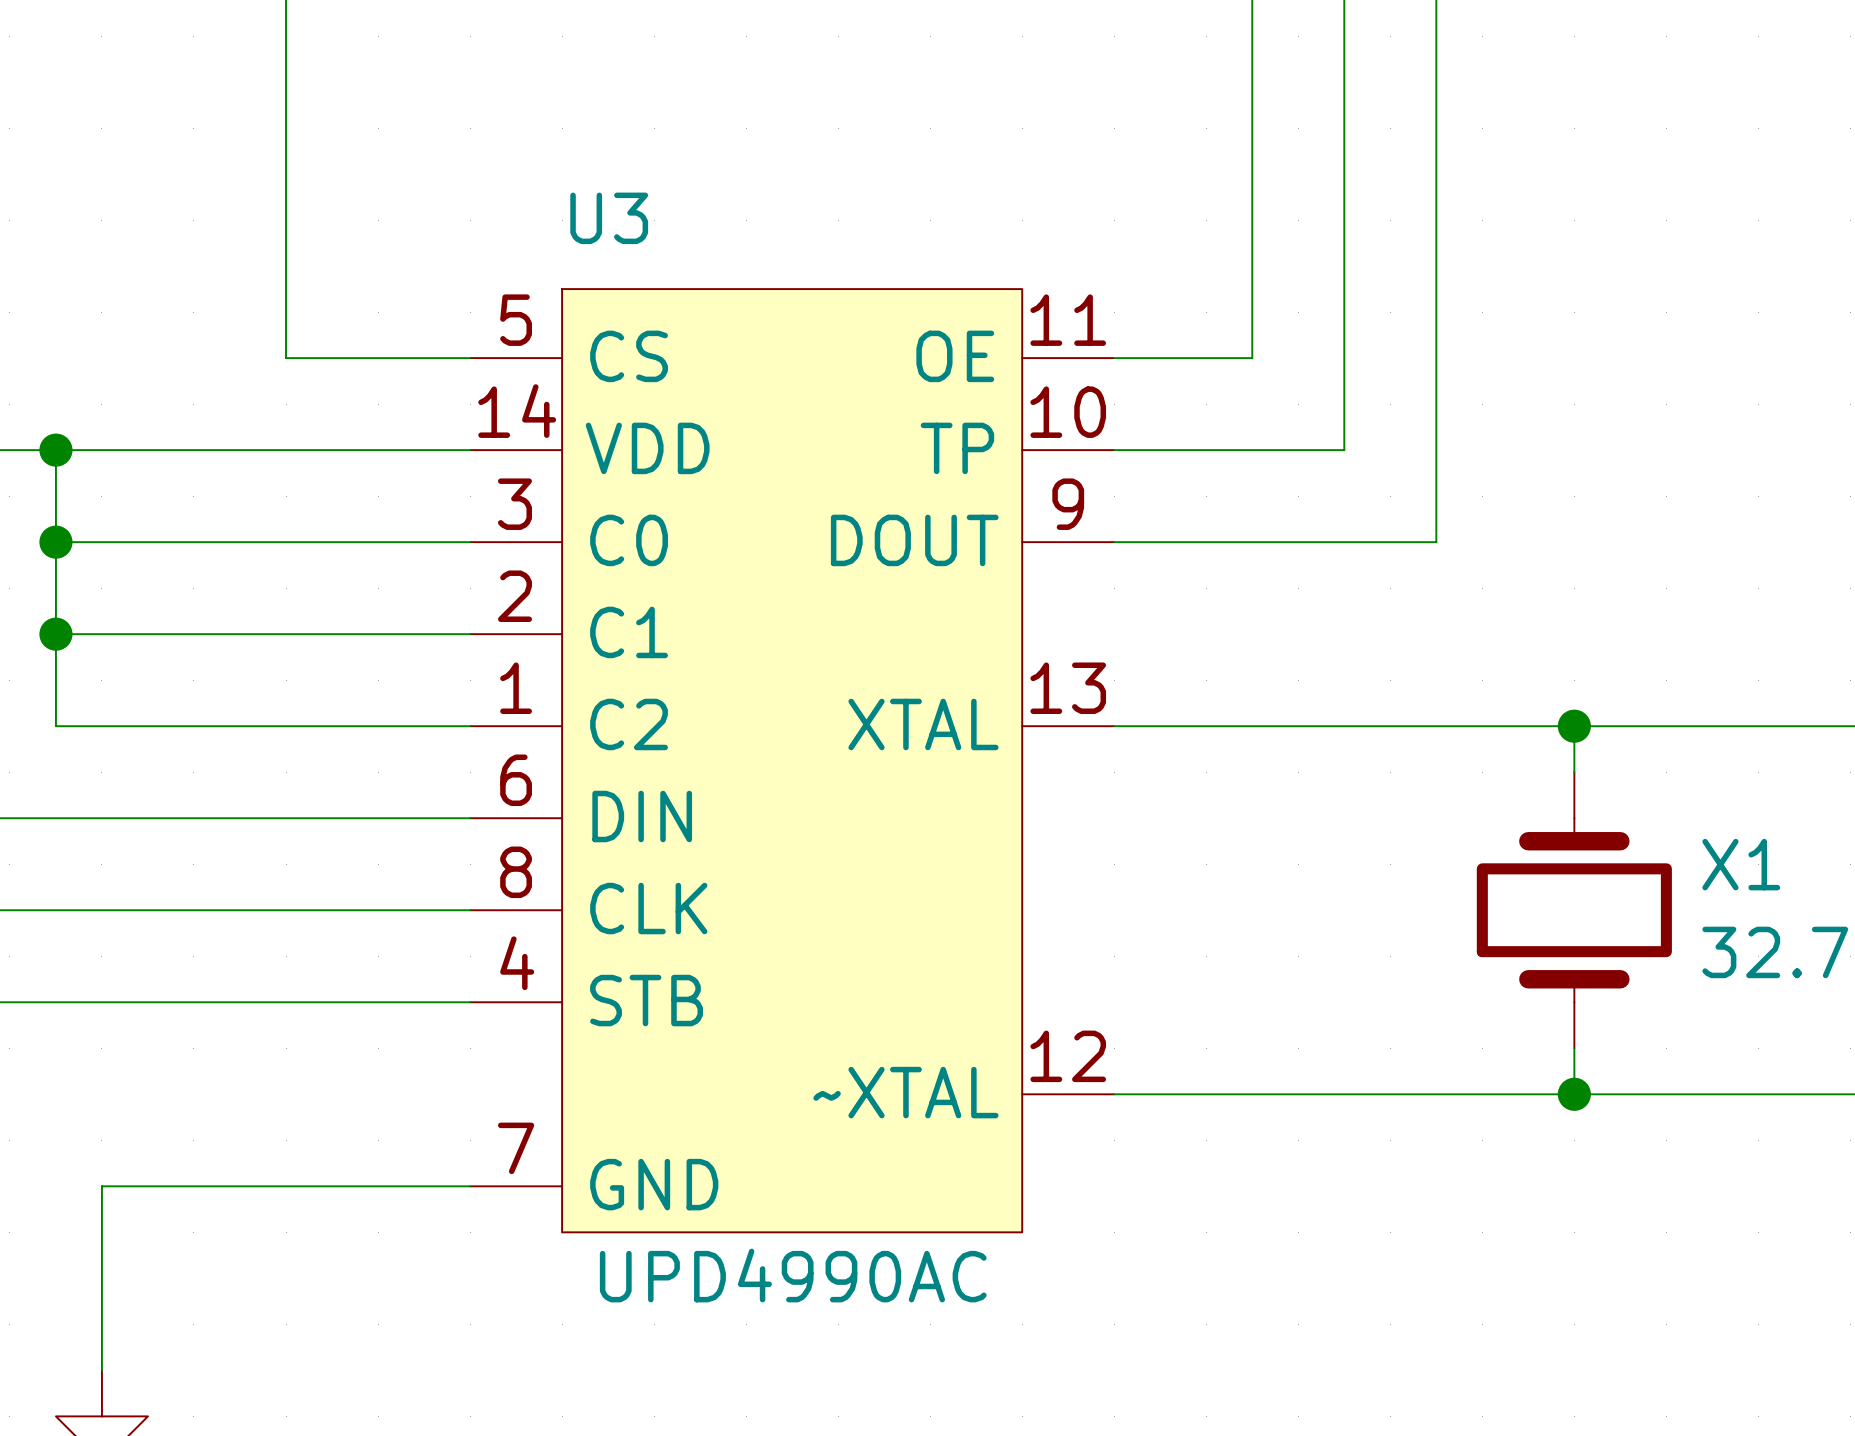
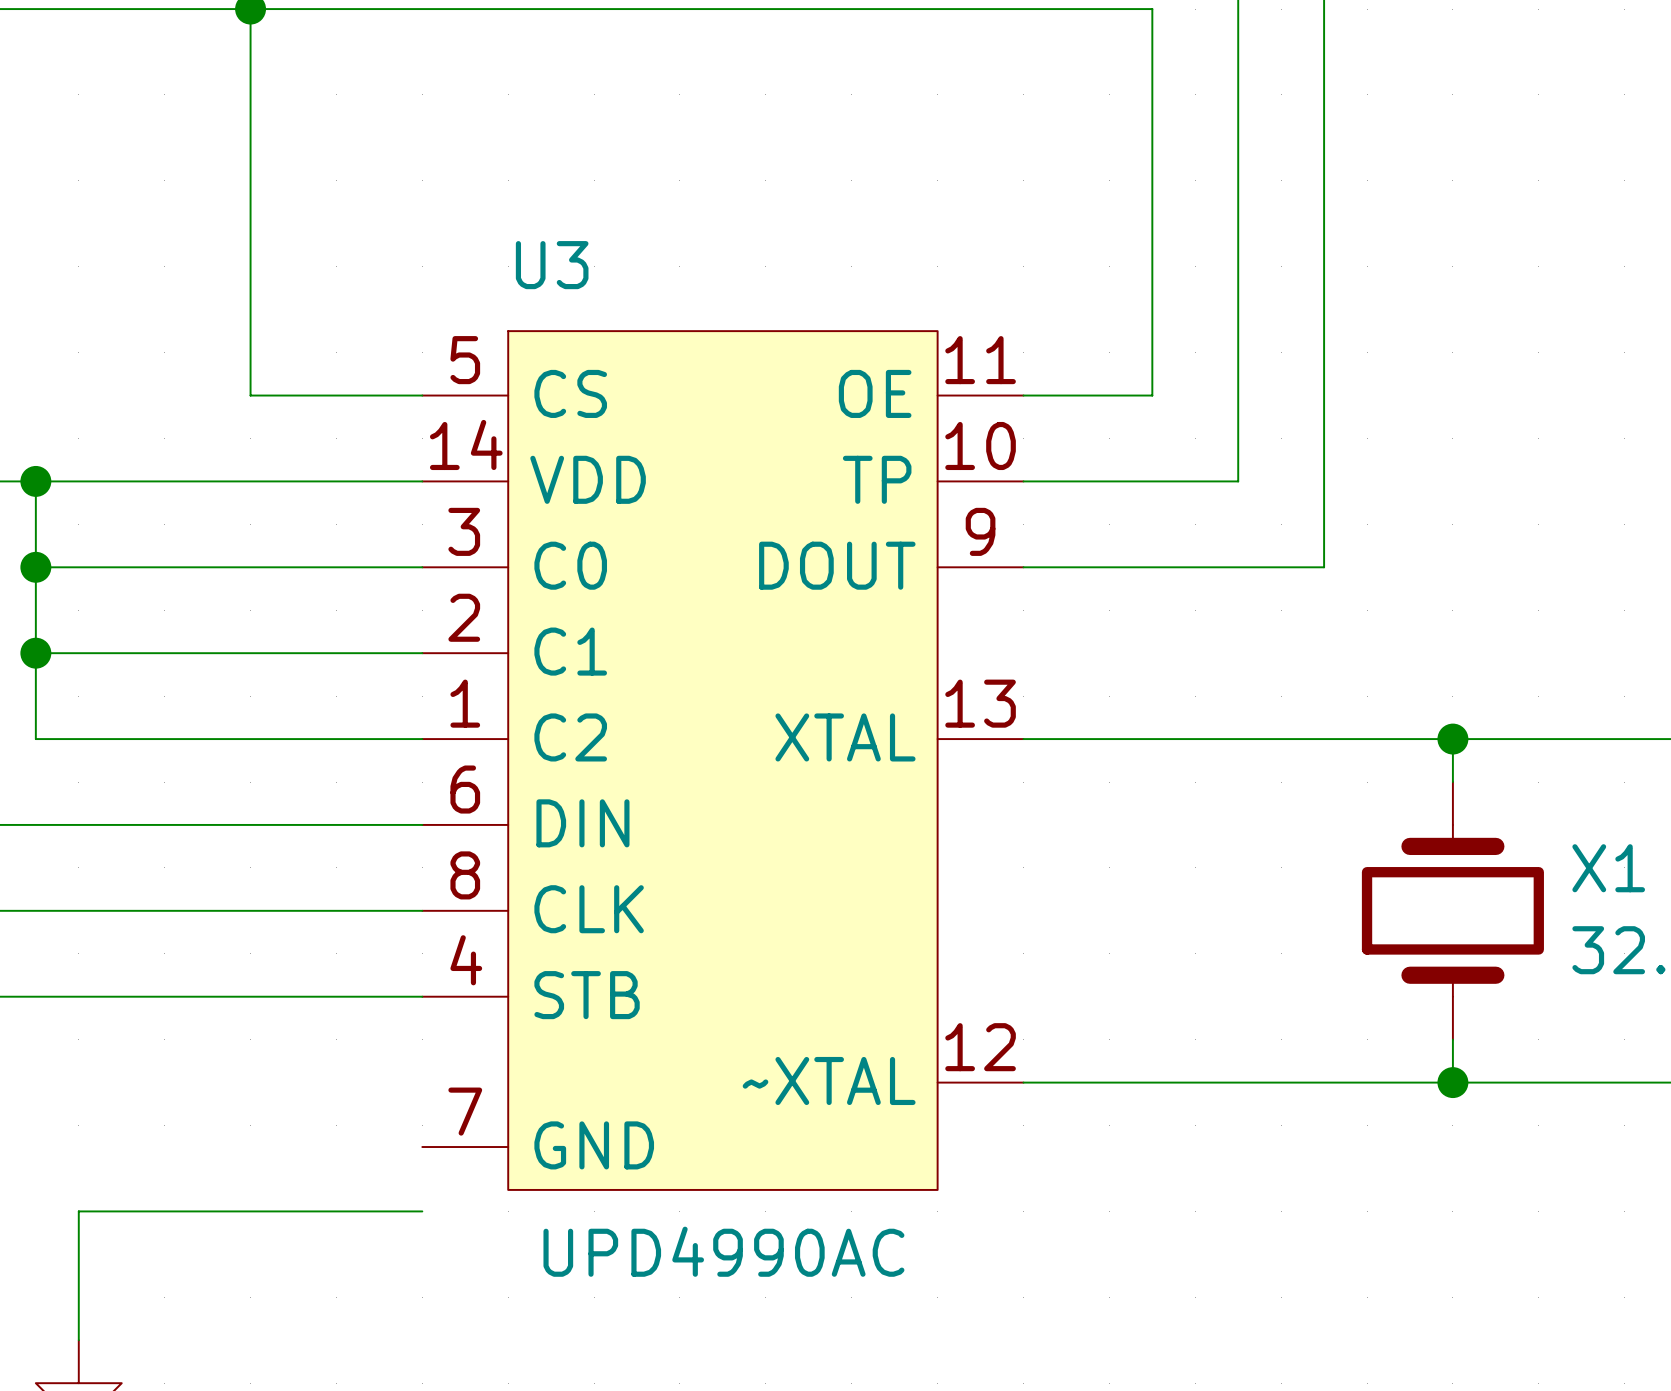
U3 symbol: [470, 289, 1115, 1233] -> [422, 331, 1024, 1190]
wire: (470, 1186) (101, 1186) (101, 1232) -> (422, 1211) (78, 1211)

